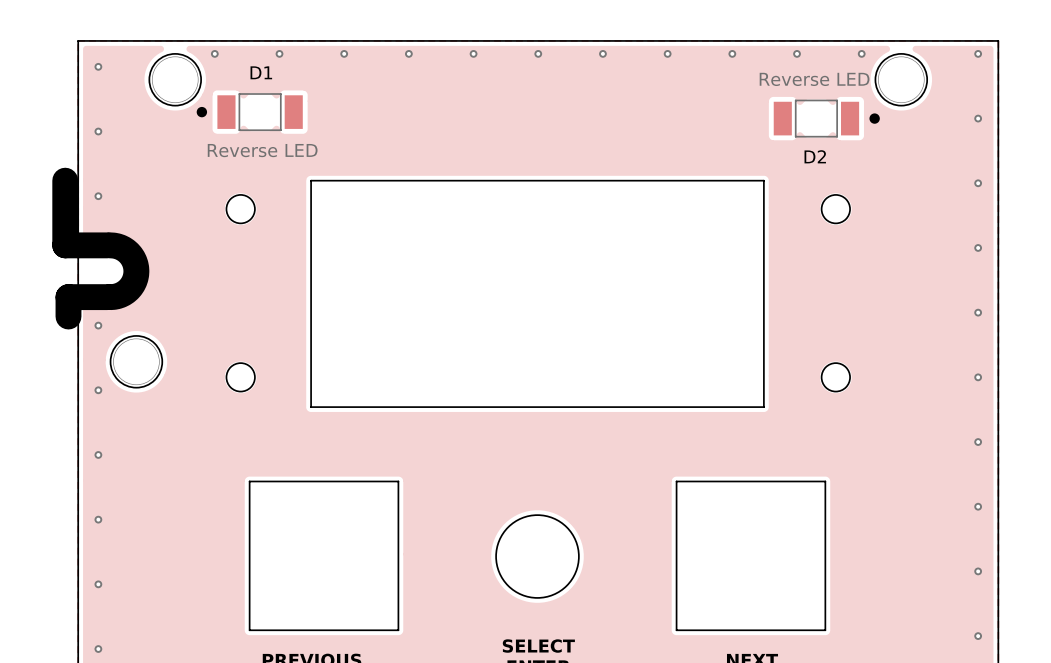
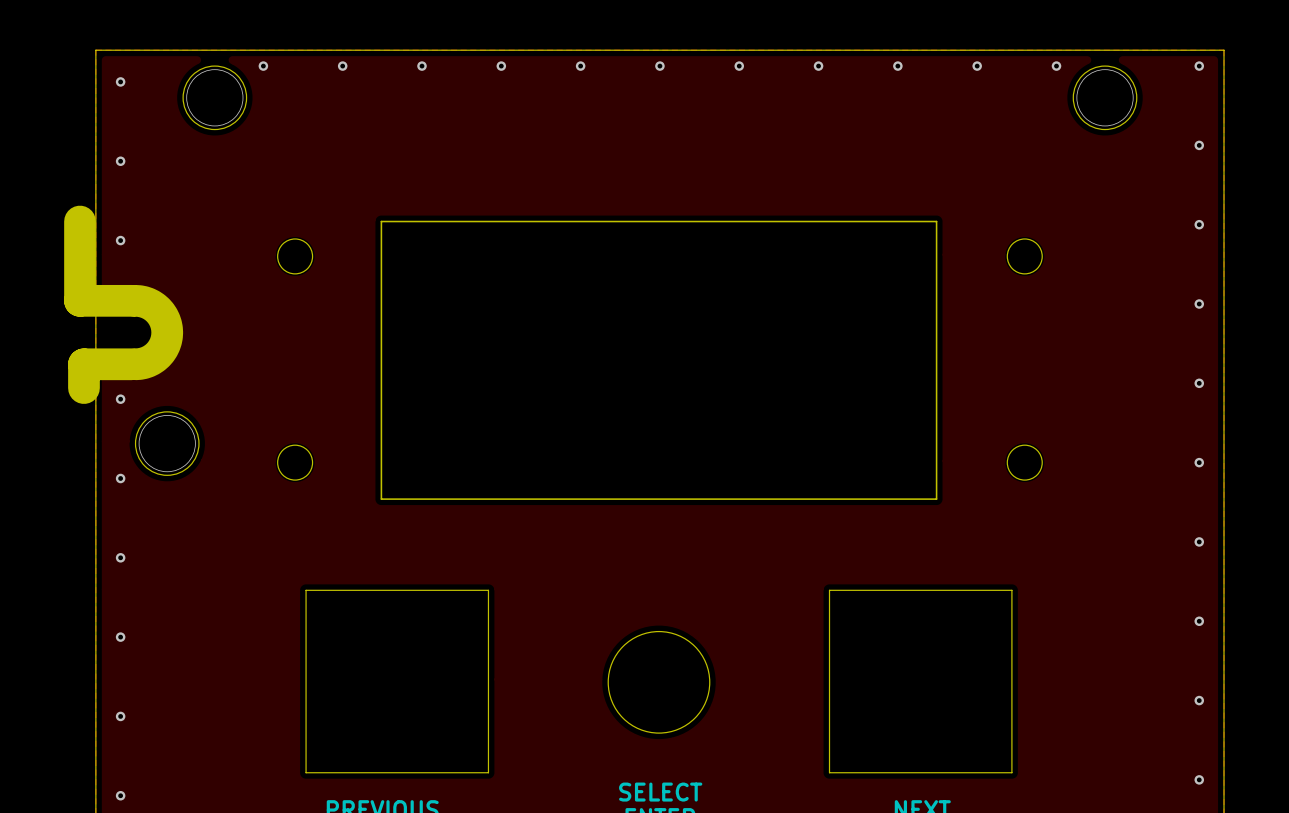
D1: Reverse LED (249, 112) -> none
D2: Reverse LED (826, 118) -> none

